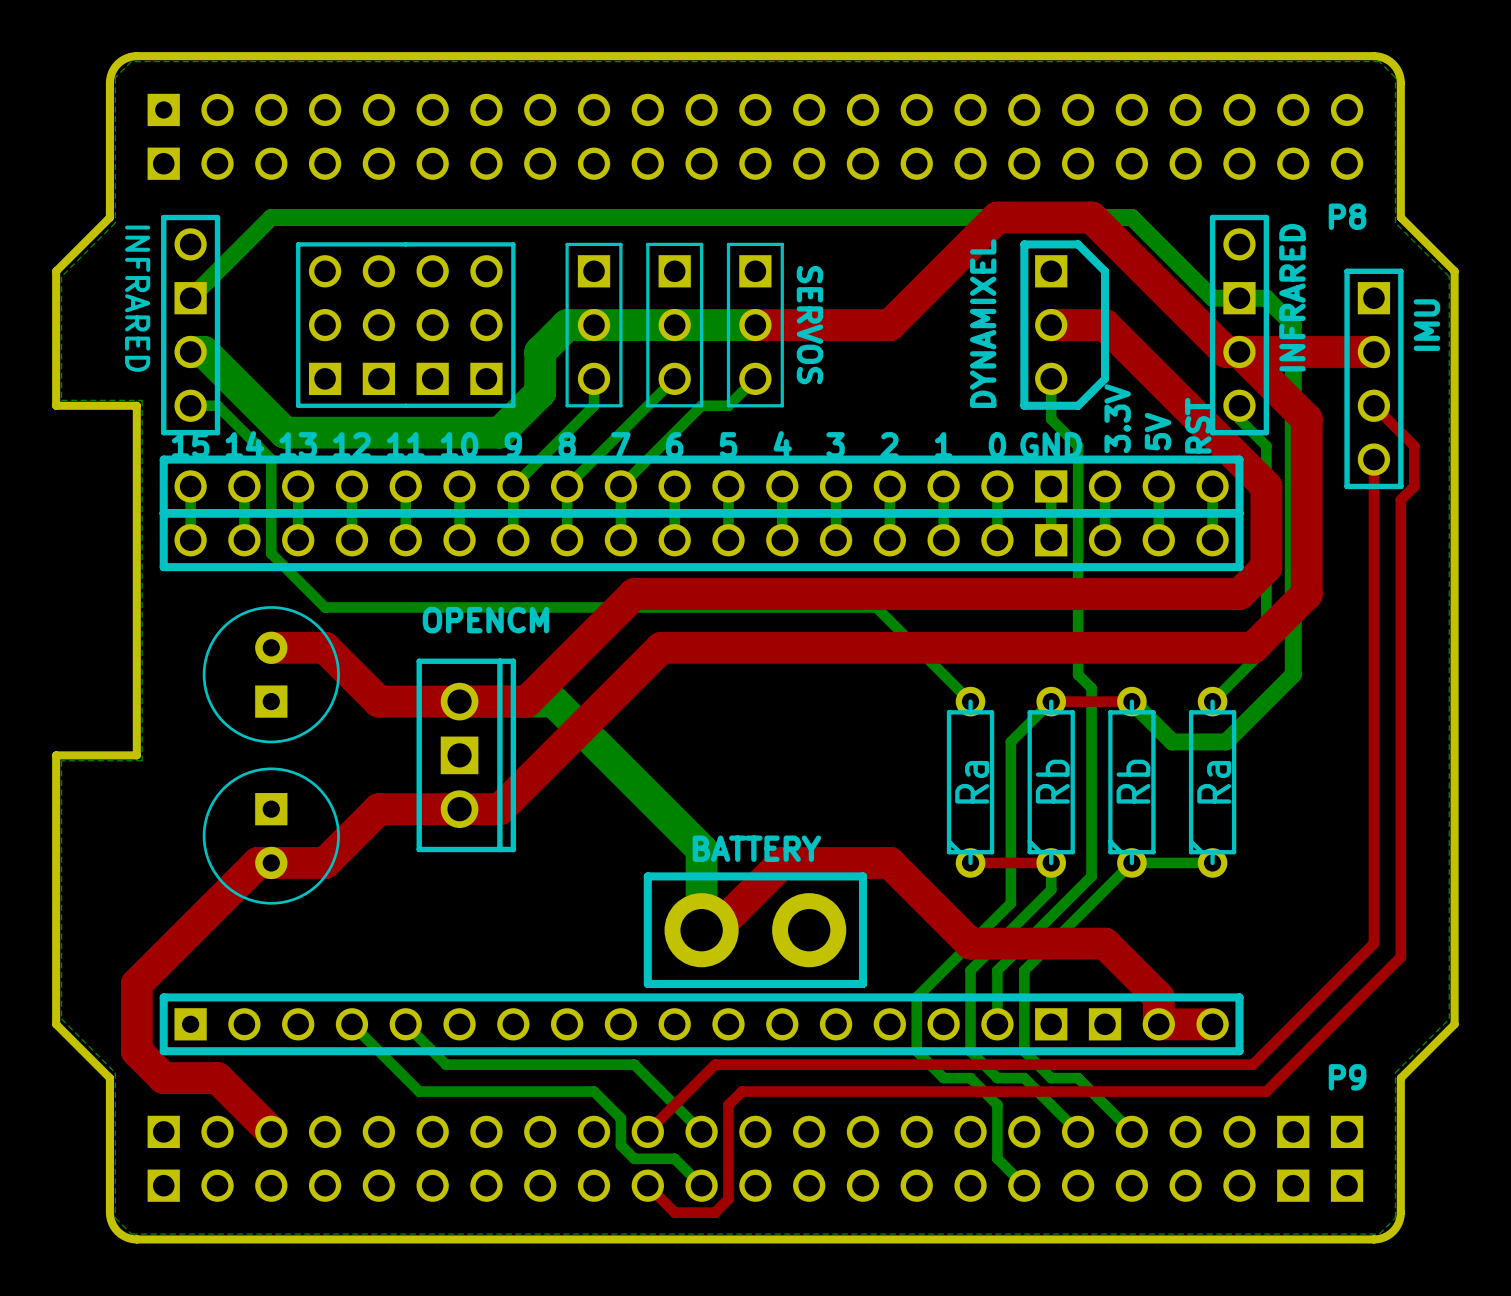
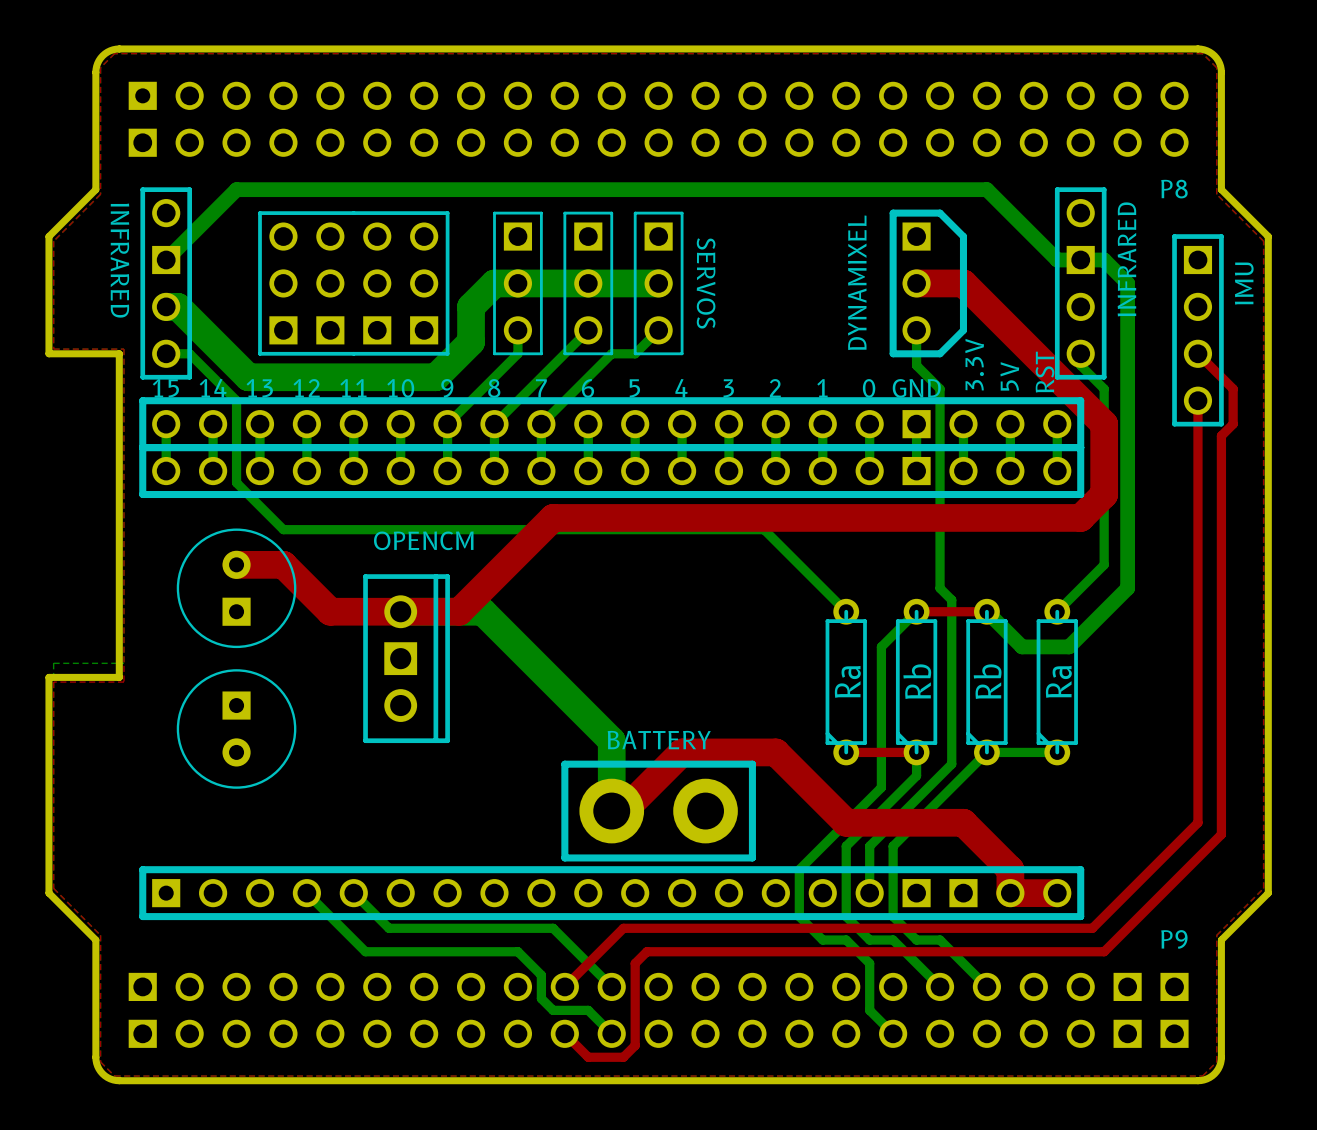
top zone outline: none -> (114, 53) (1202, 53) (1216, 67) (1216, 194) (1263, 241) (1263, 888) (1216, 935) (1216, 1061) (1202, 1076) (114, 1076) (100, 1061) (100, 935) (53, 888) (53, 682) (123, 682) (123, 349) (53, 349) (53, 241) (100, 194) (100, 67) (114, 53)
top track: (755, 325) (889, 325) (997, 217) (1091, 217) (1226, 351) (1373, 351) -> none
top track: (1239, 351) (1306, 419) (1306, 594) (1252, 647) (661, 647) (499, 809) (378, 809) (325, 862) (257, 862) (136, 983) (136, 1051) (163, 1078) (217, 1078) (271, 1131) -> none
board edge: (136, 755) (56, 755) (56, 776) -> (119, 658) (119, 677) (48, 677)

